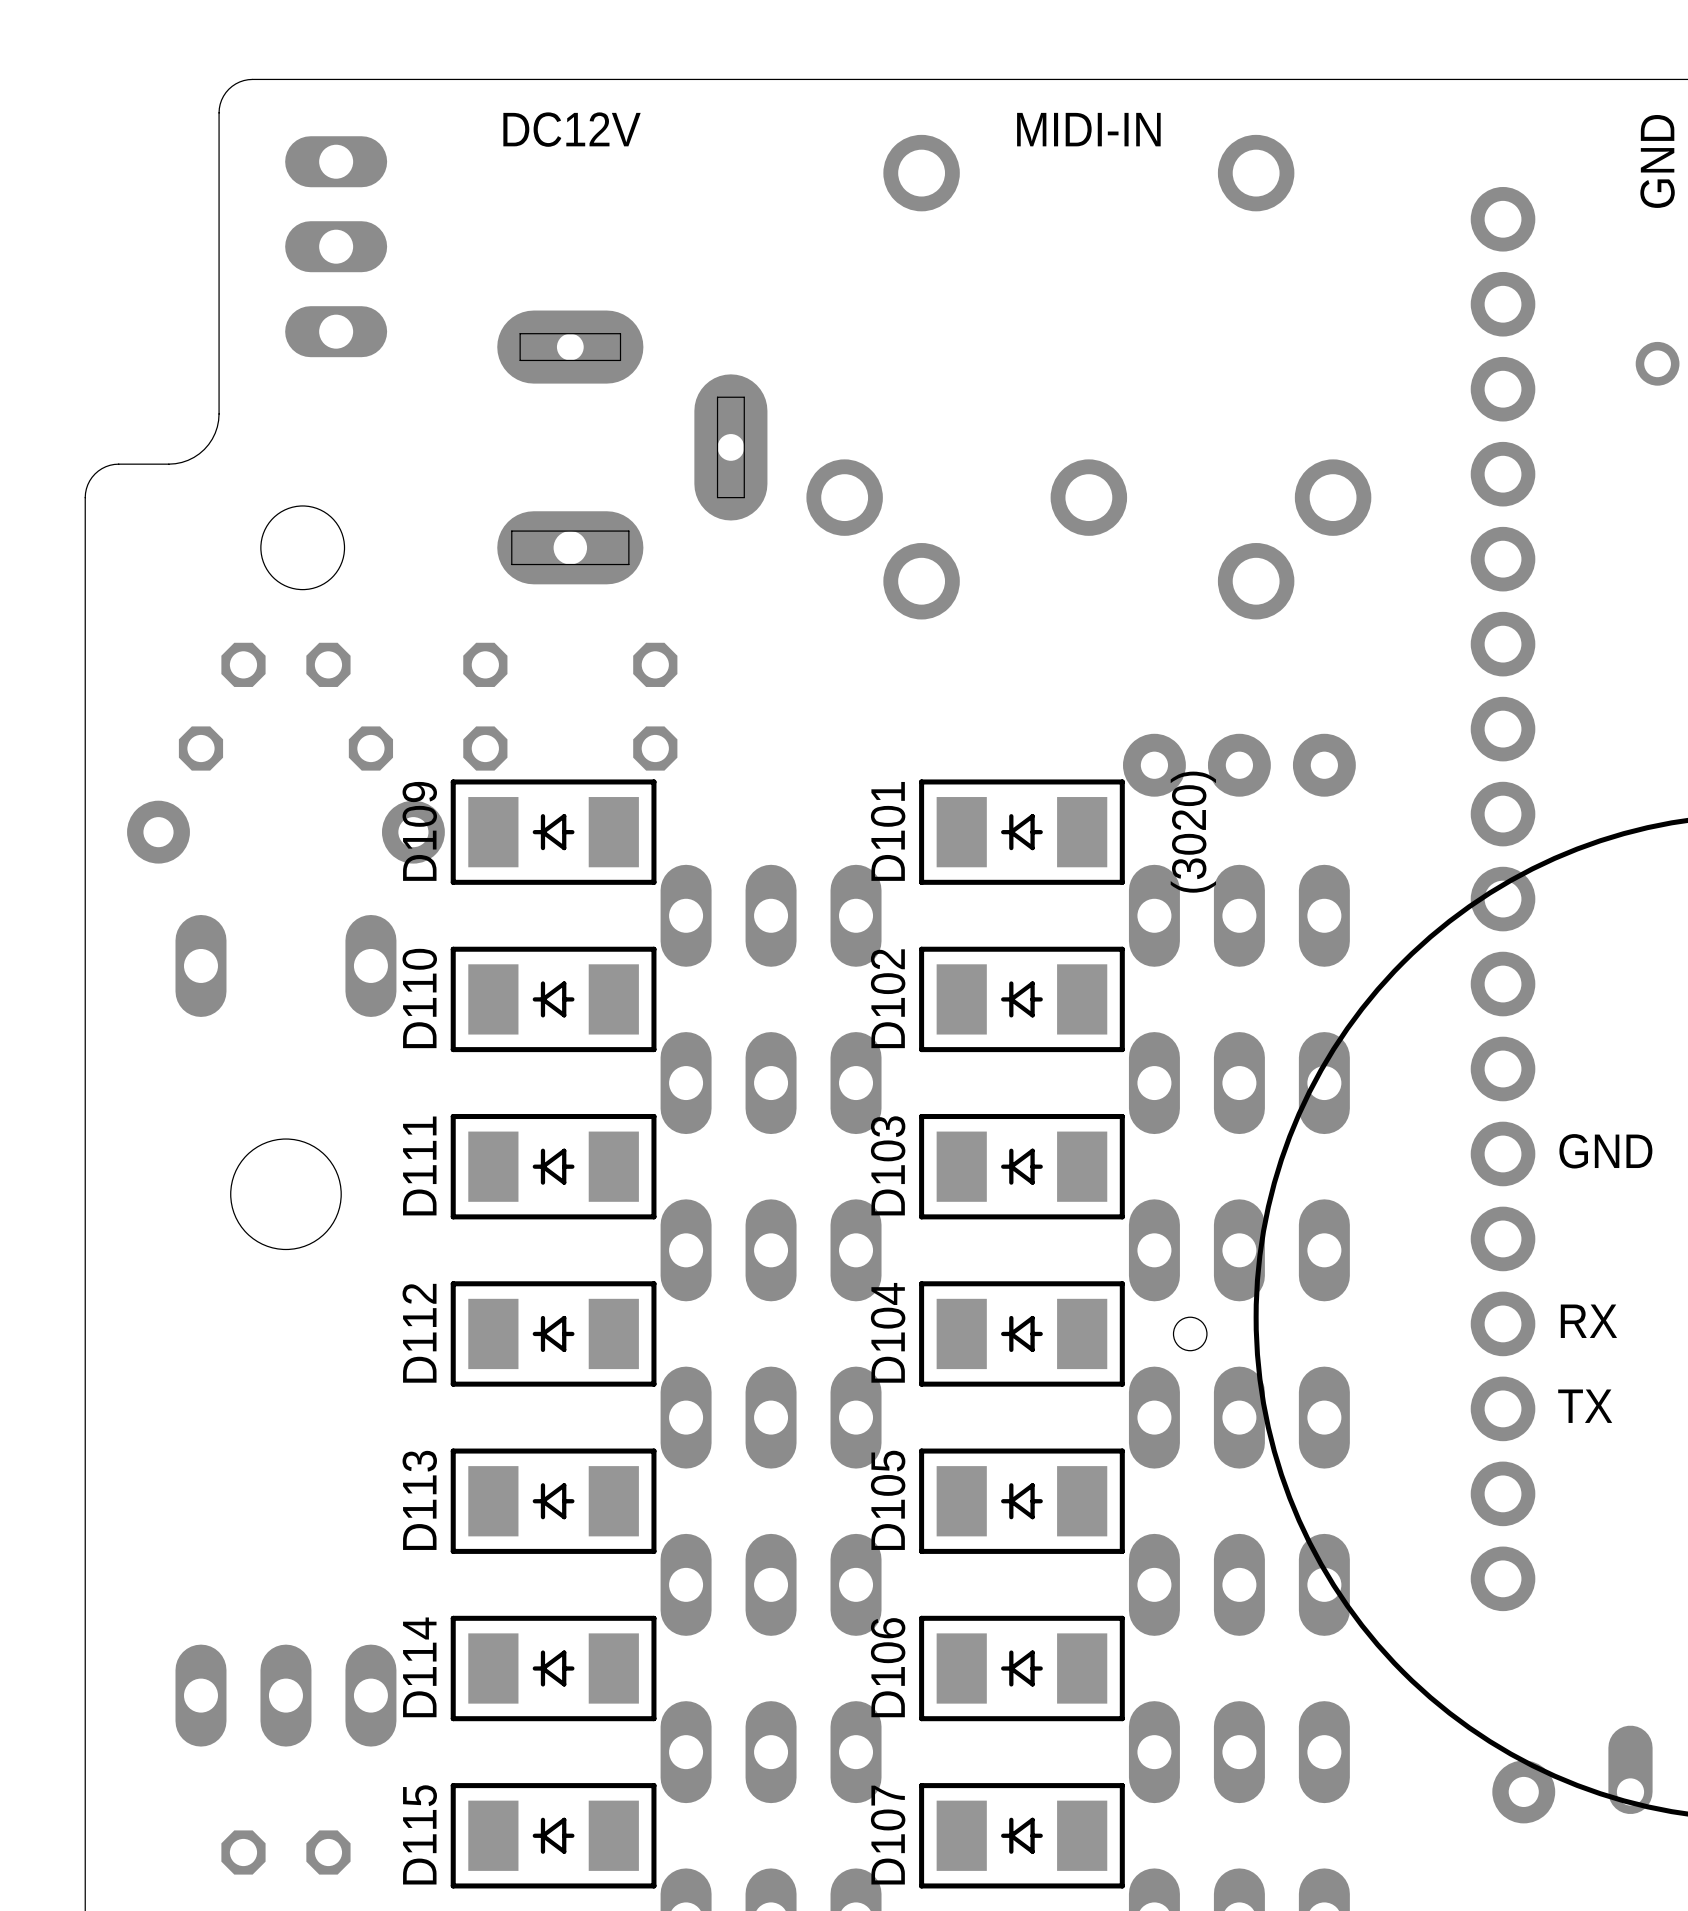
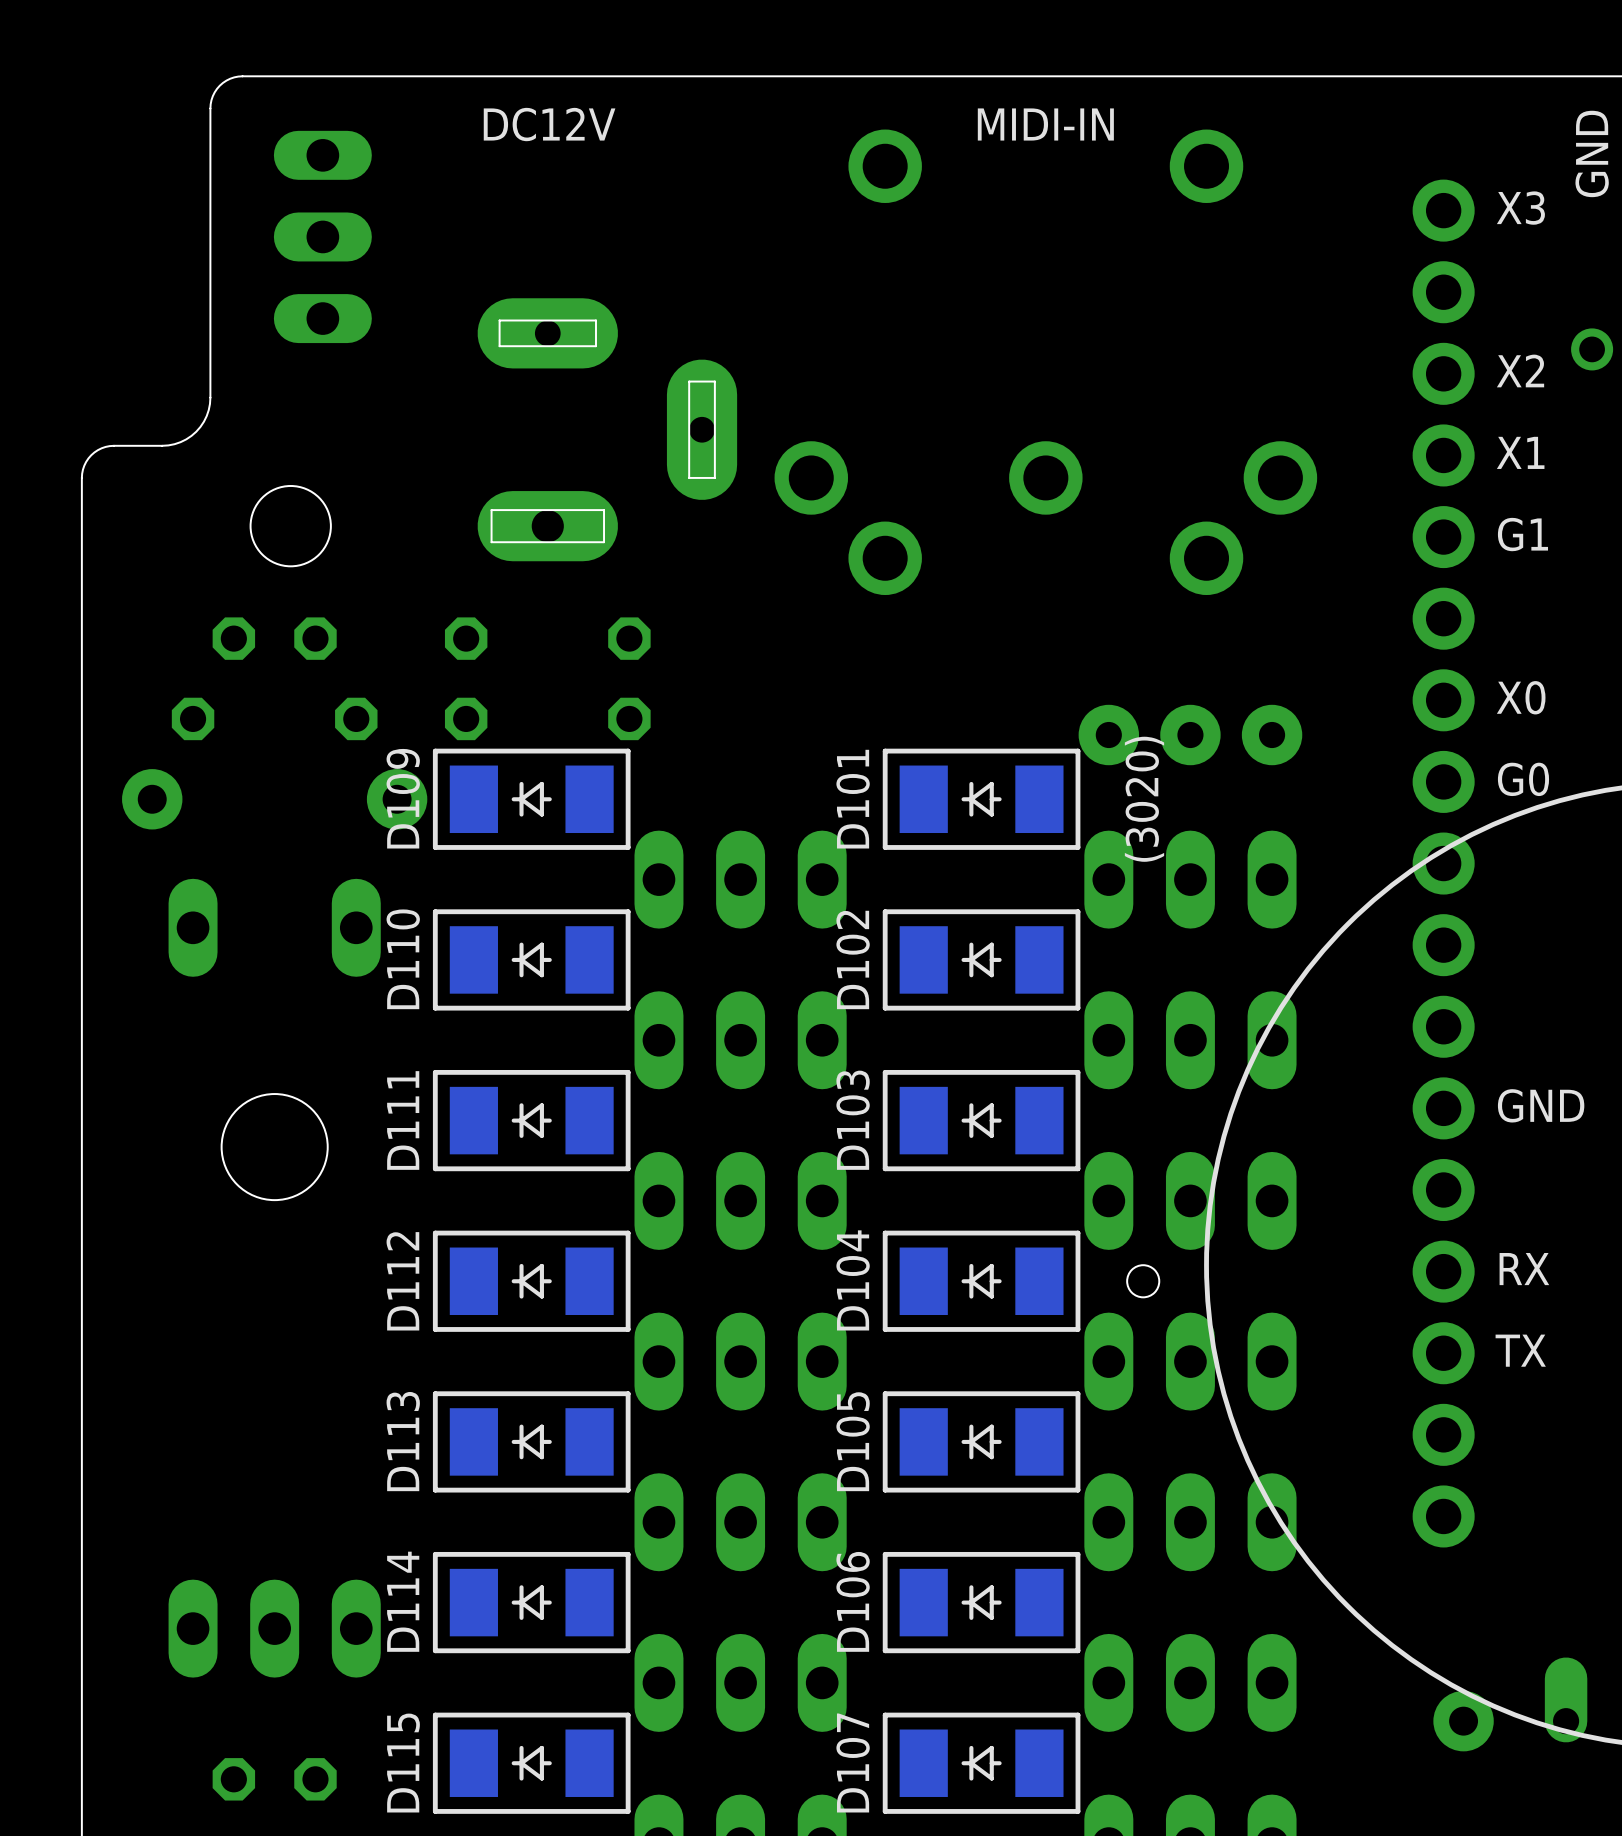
text: none -> X3 (1520, 208)
text: none -> X2 (1520, 370)
text: none -> X1 (1520, 452)
text: none -> G1 (1522, 534)
text: none -> X0 (1521, 697)
text: none -> G0 (1523, 779)

